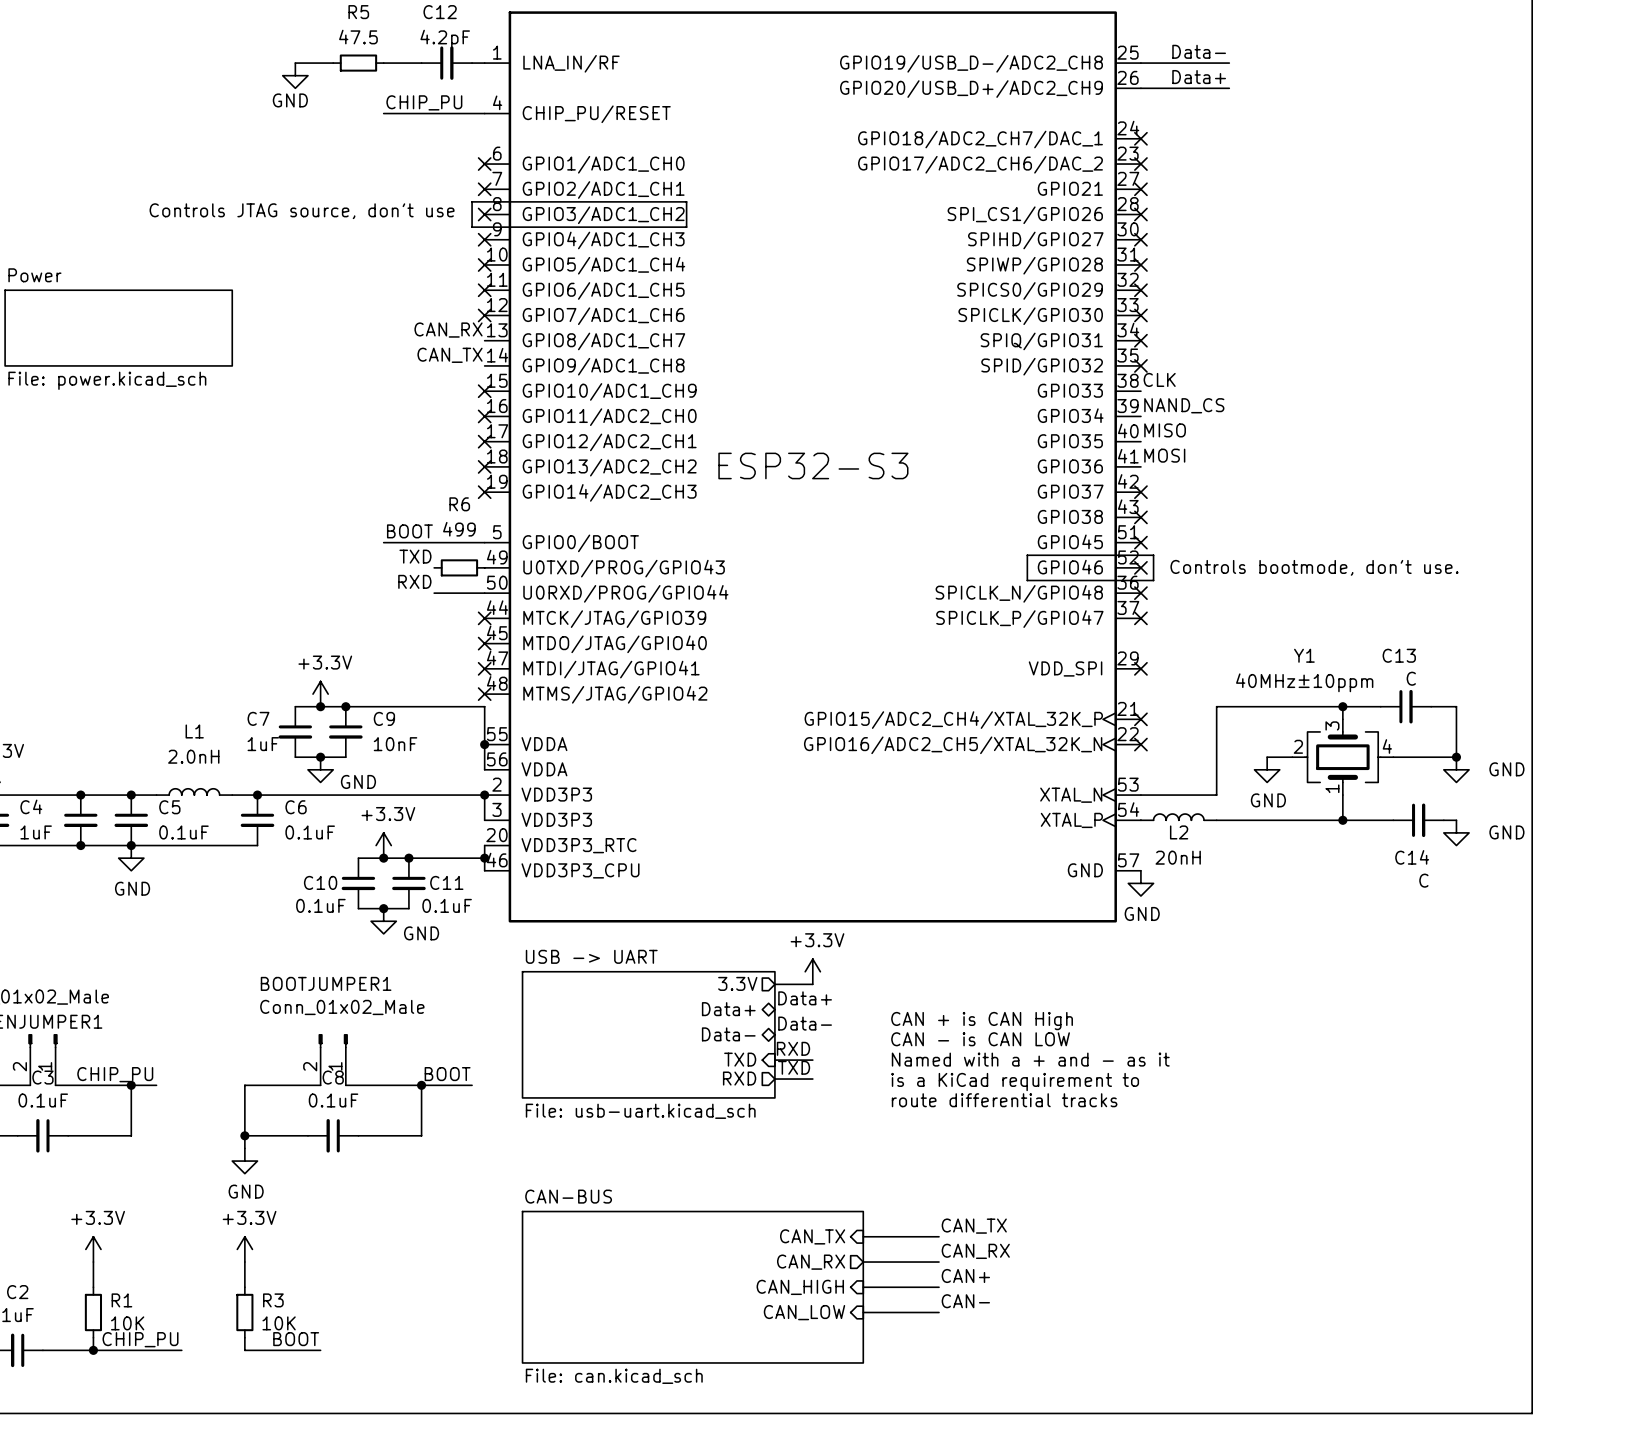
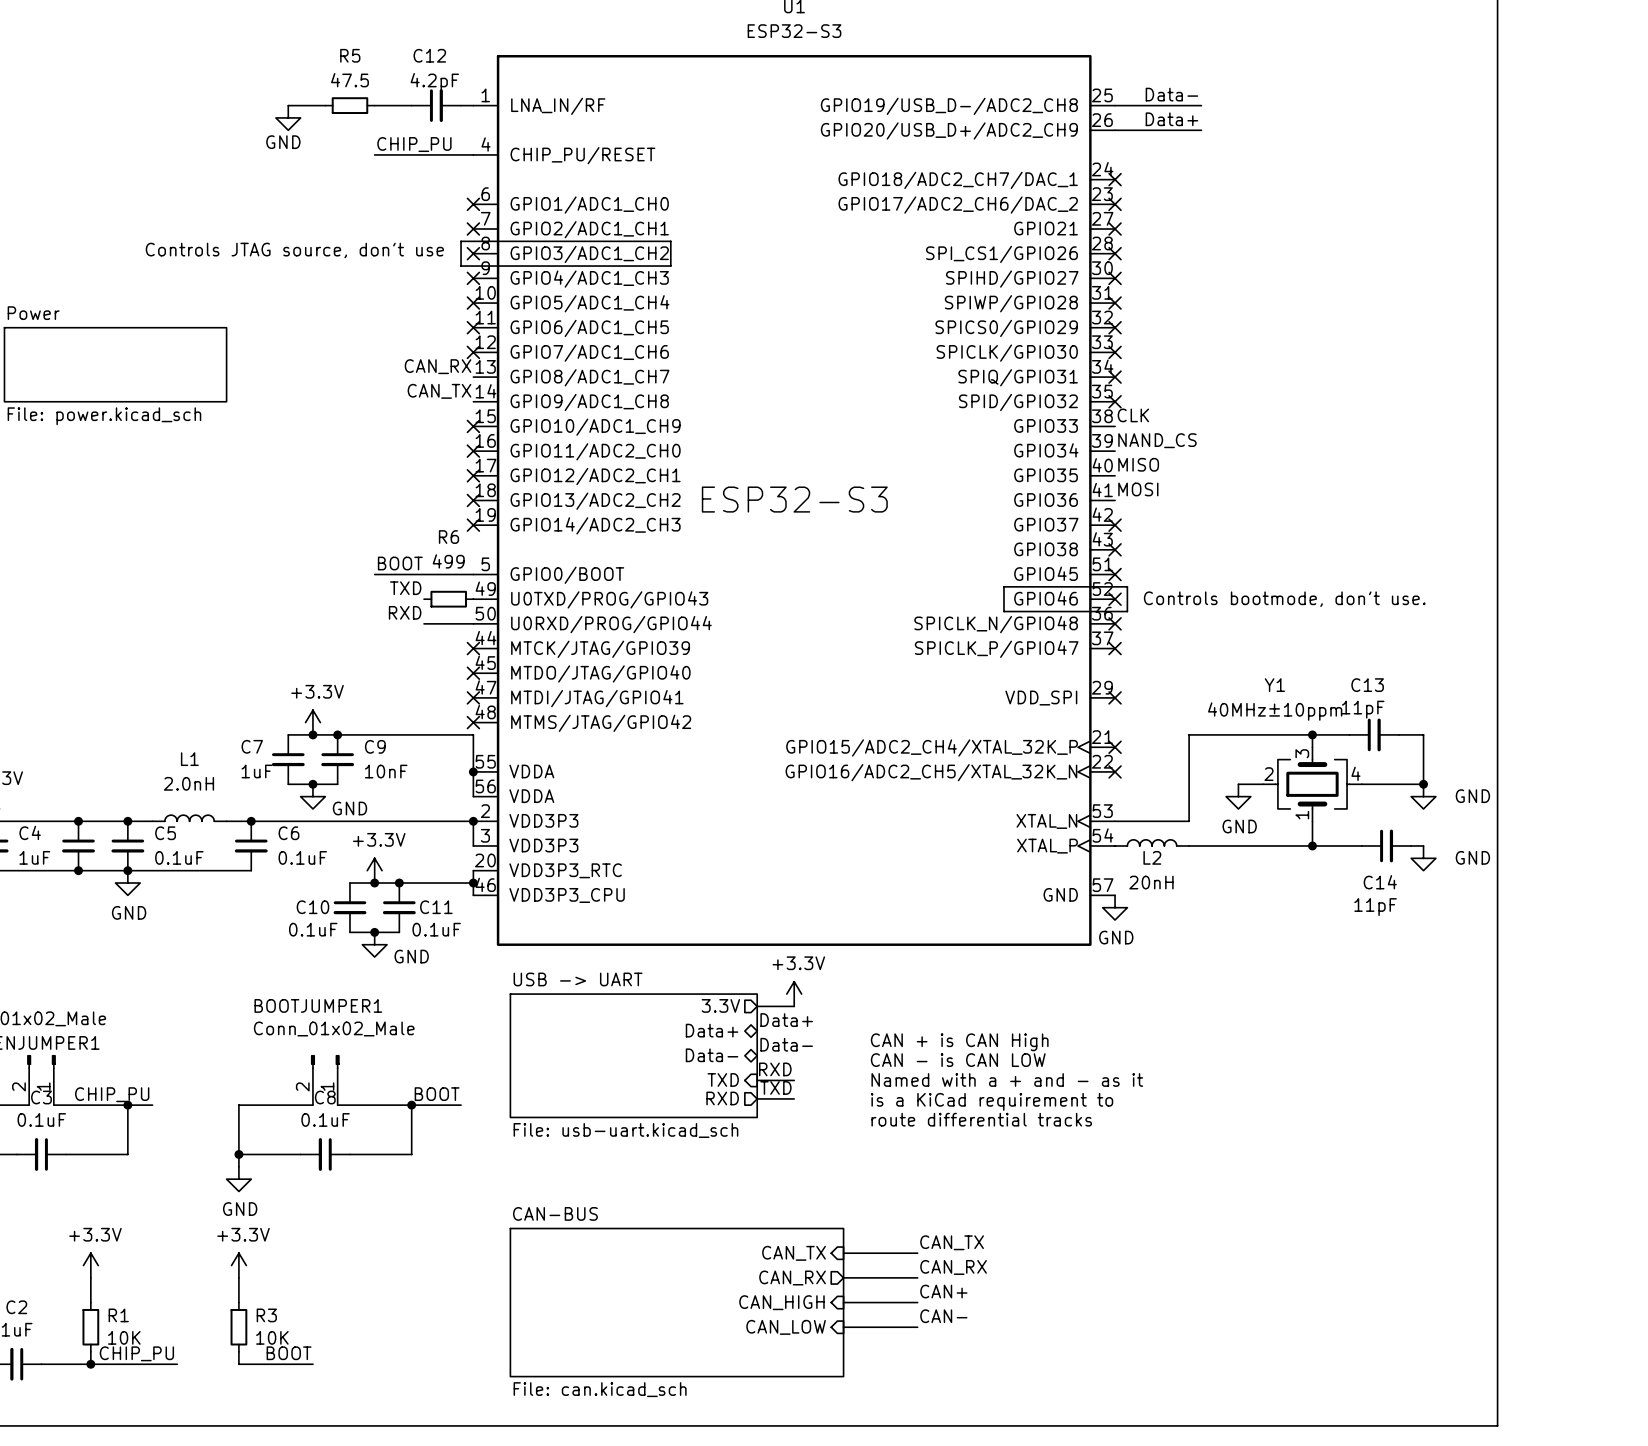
C13 value: C (1411, 678) -> 11pF (1363, 709)
C14 value: C (1423, 880) -> 11pF (1375, 907)

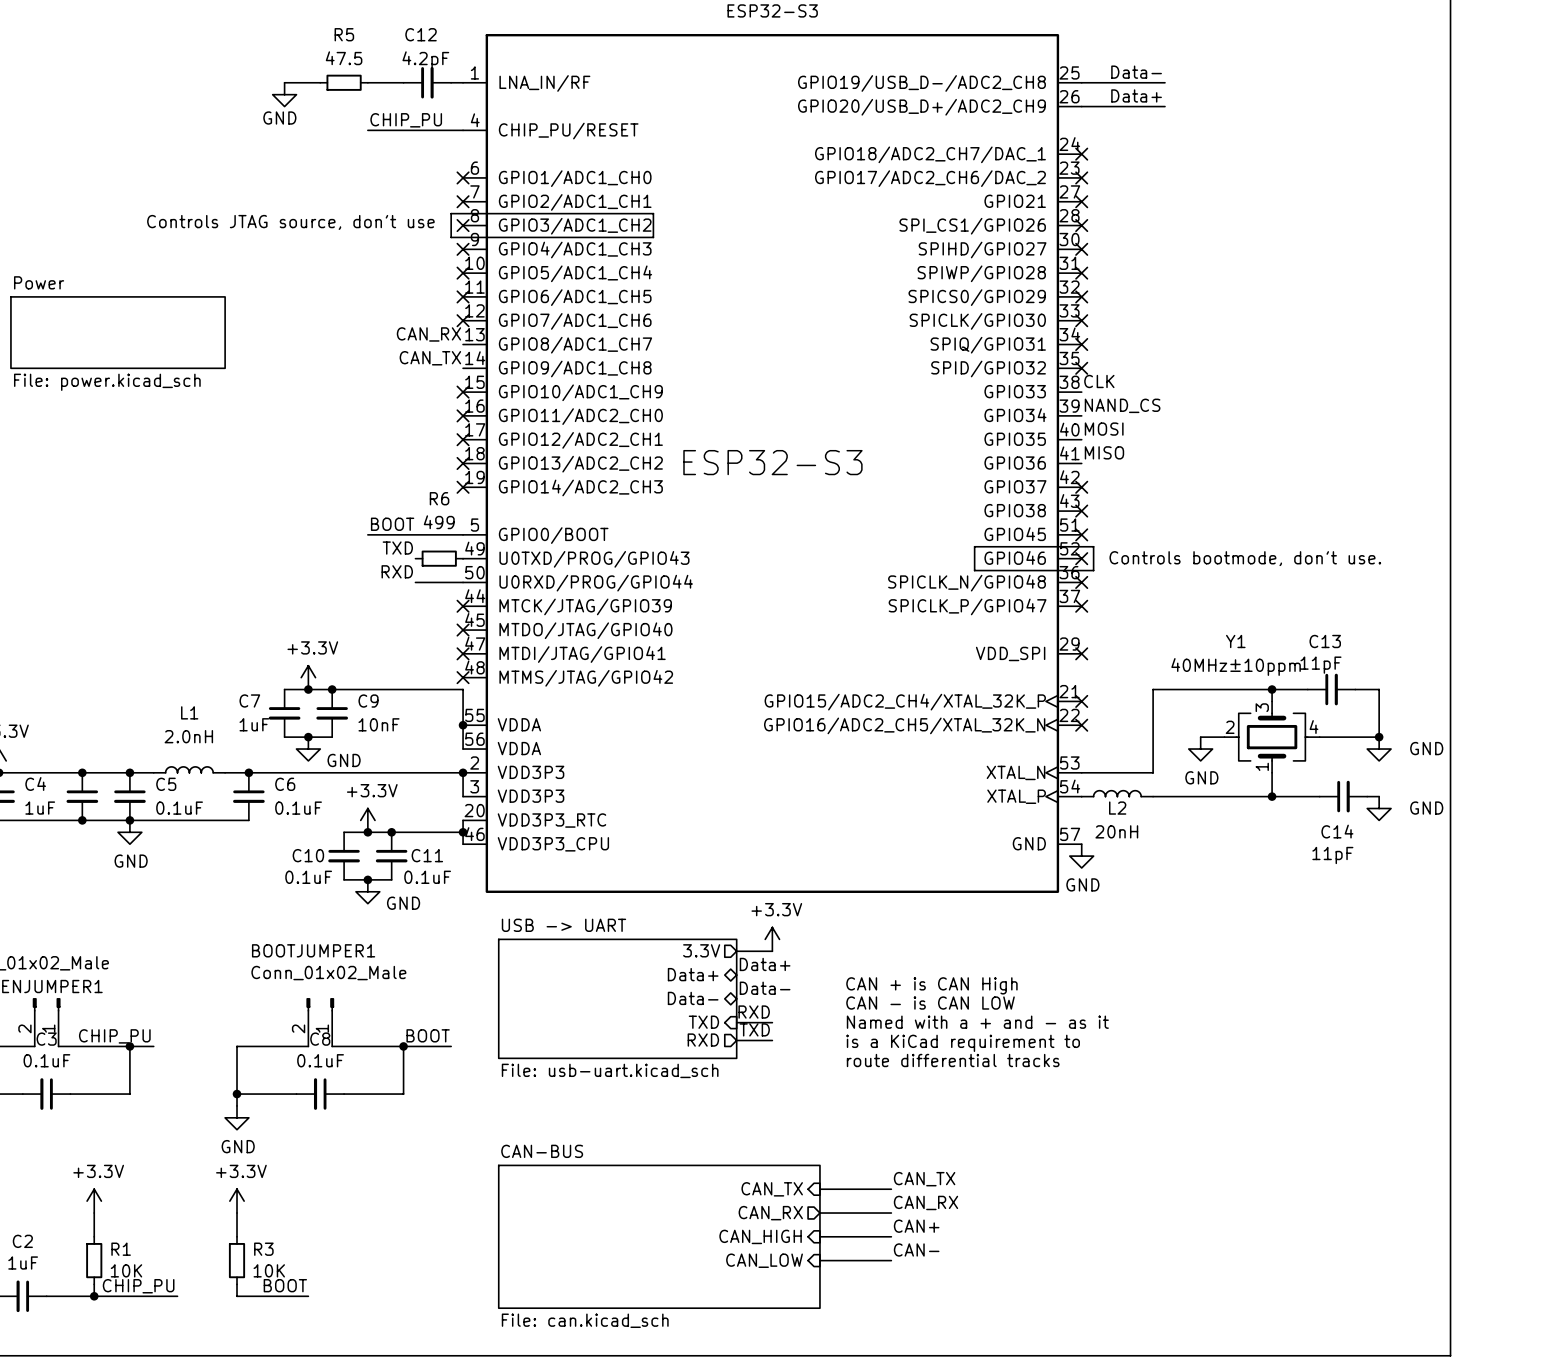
label: MISO (1138, 464) -> MOSI (1104, 429)
label: MOSI (1138, 489) -> MISO (1104, 452)

